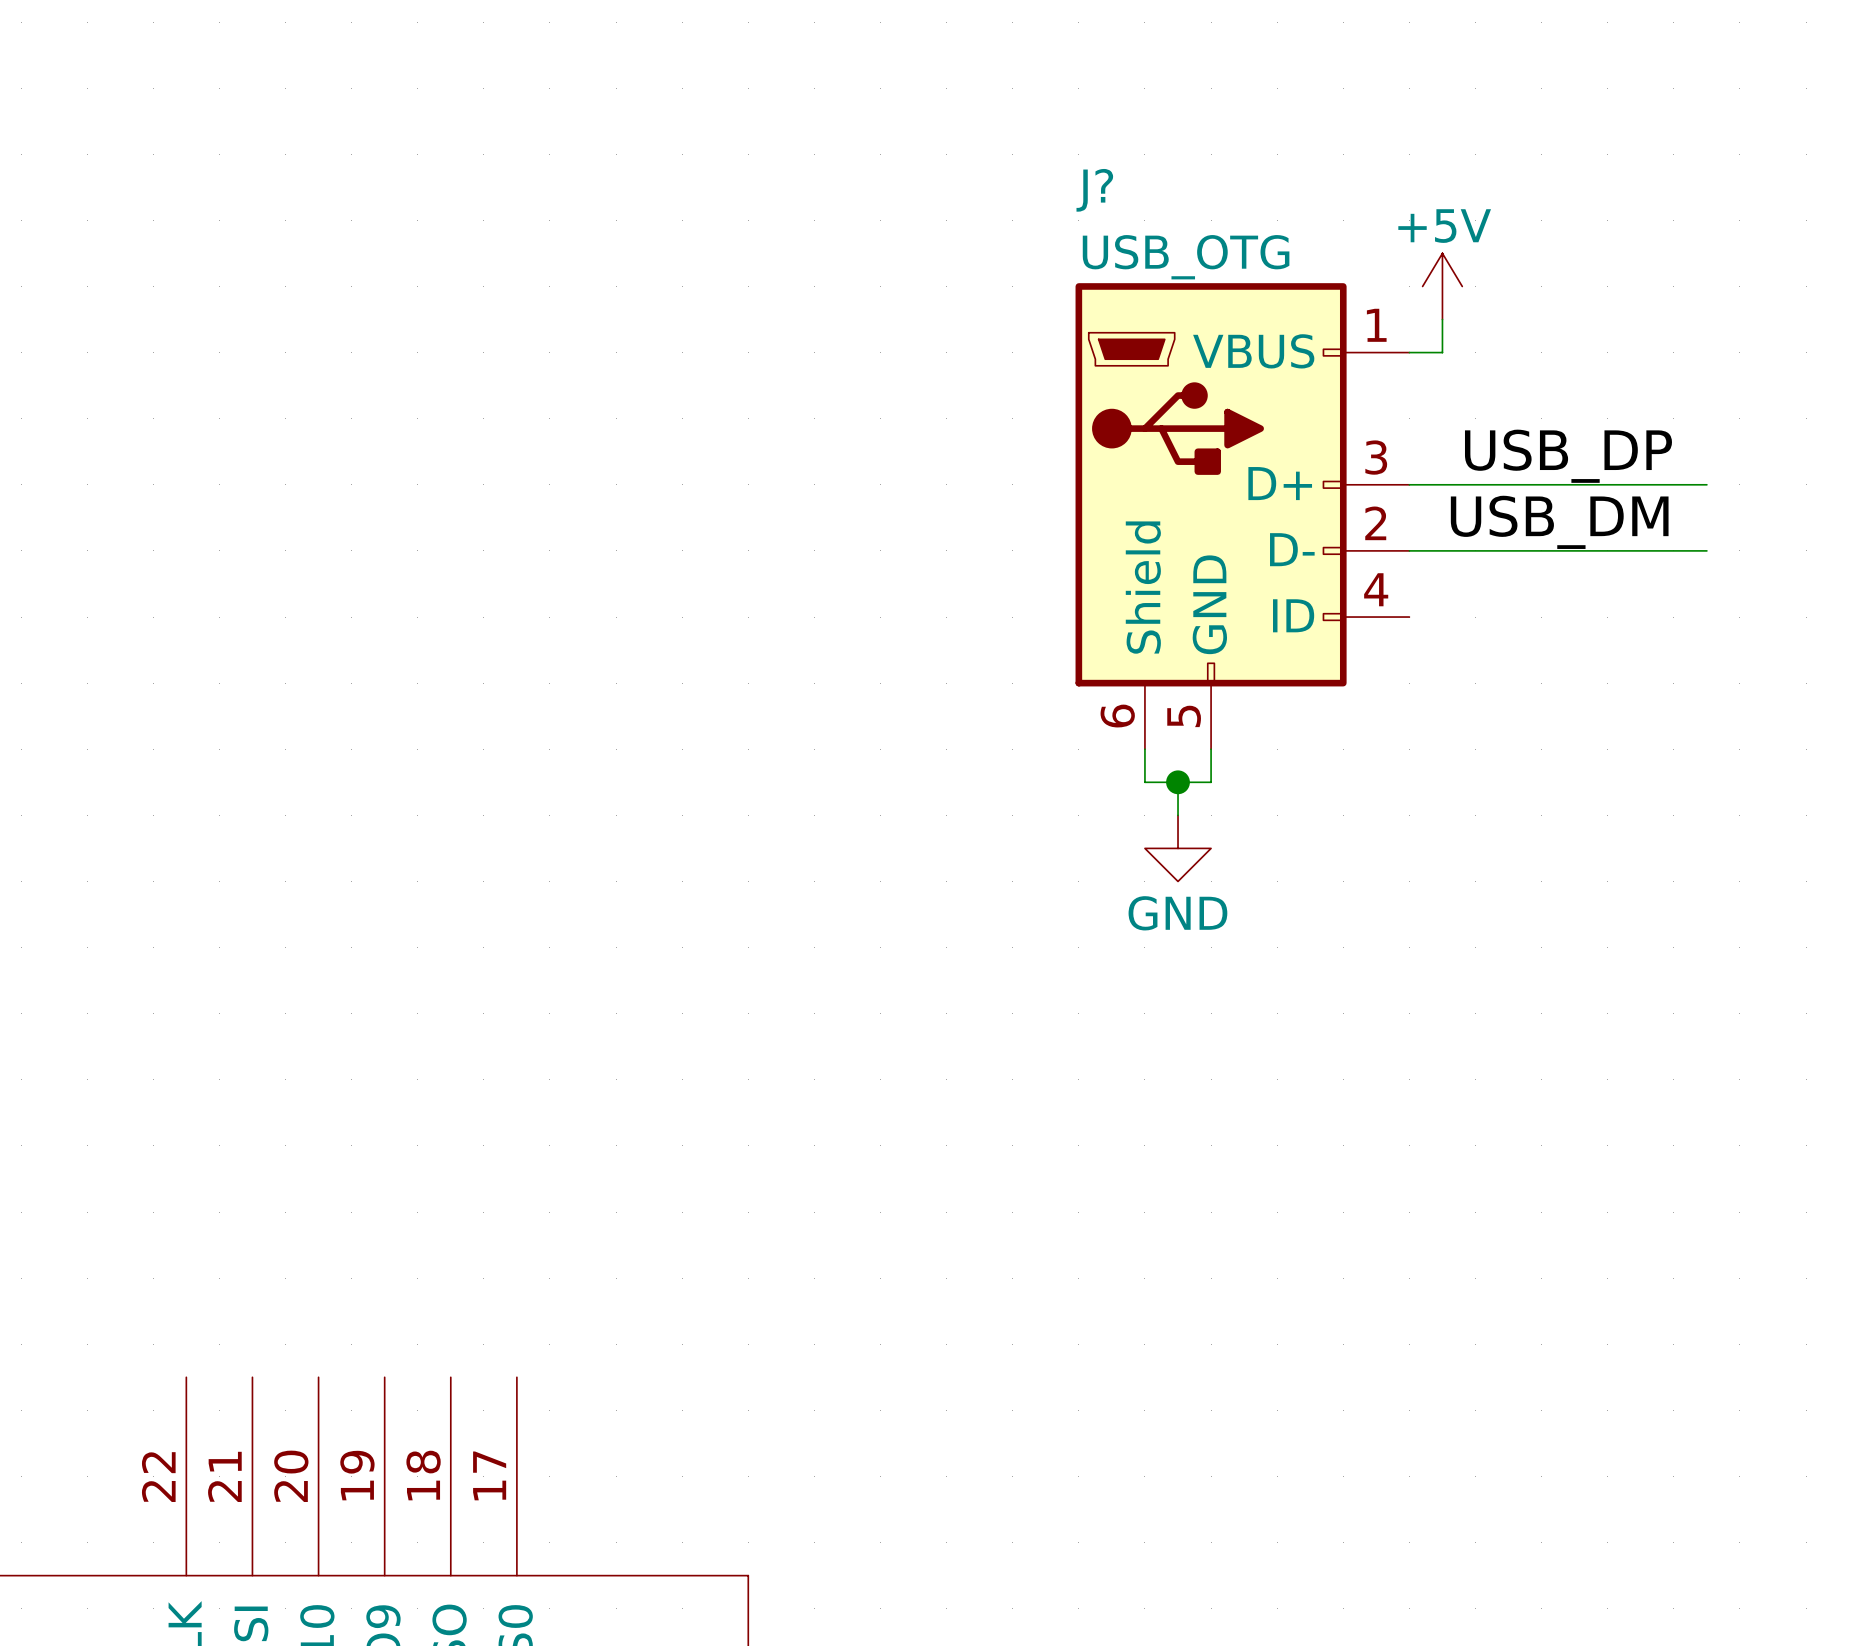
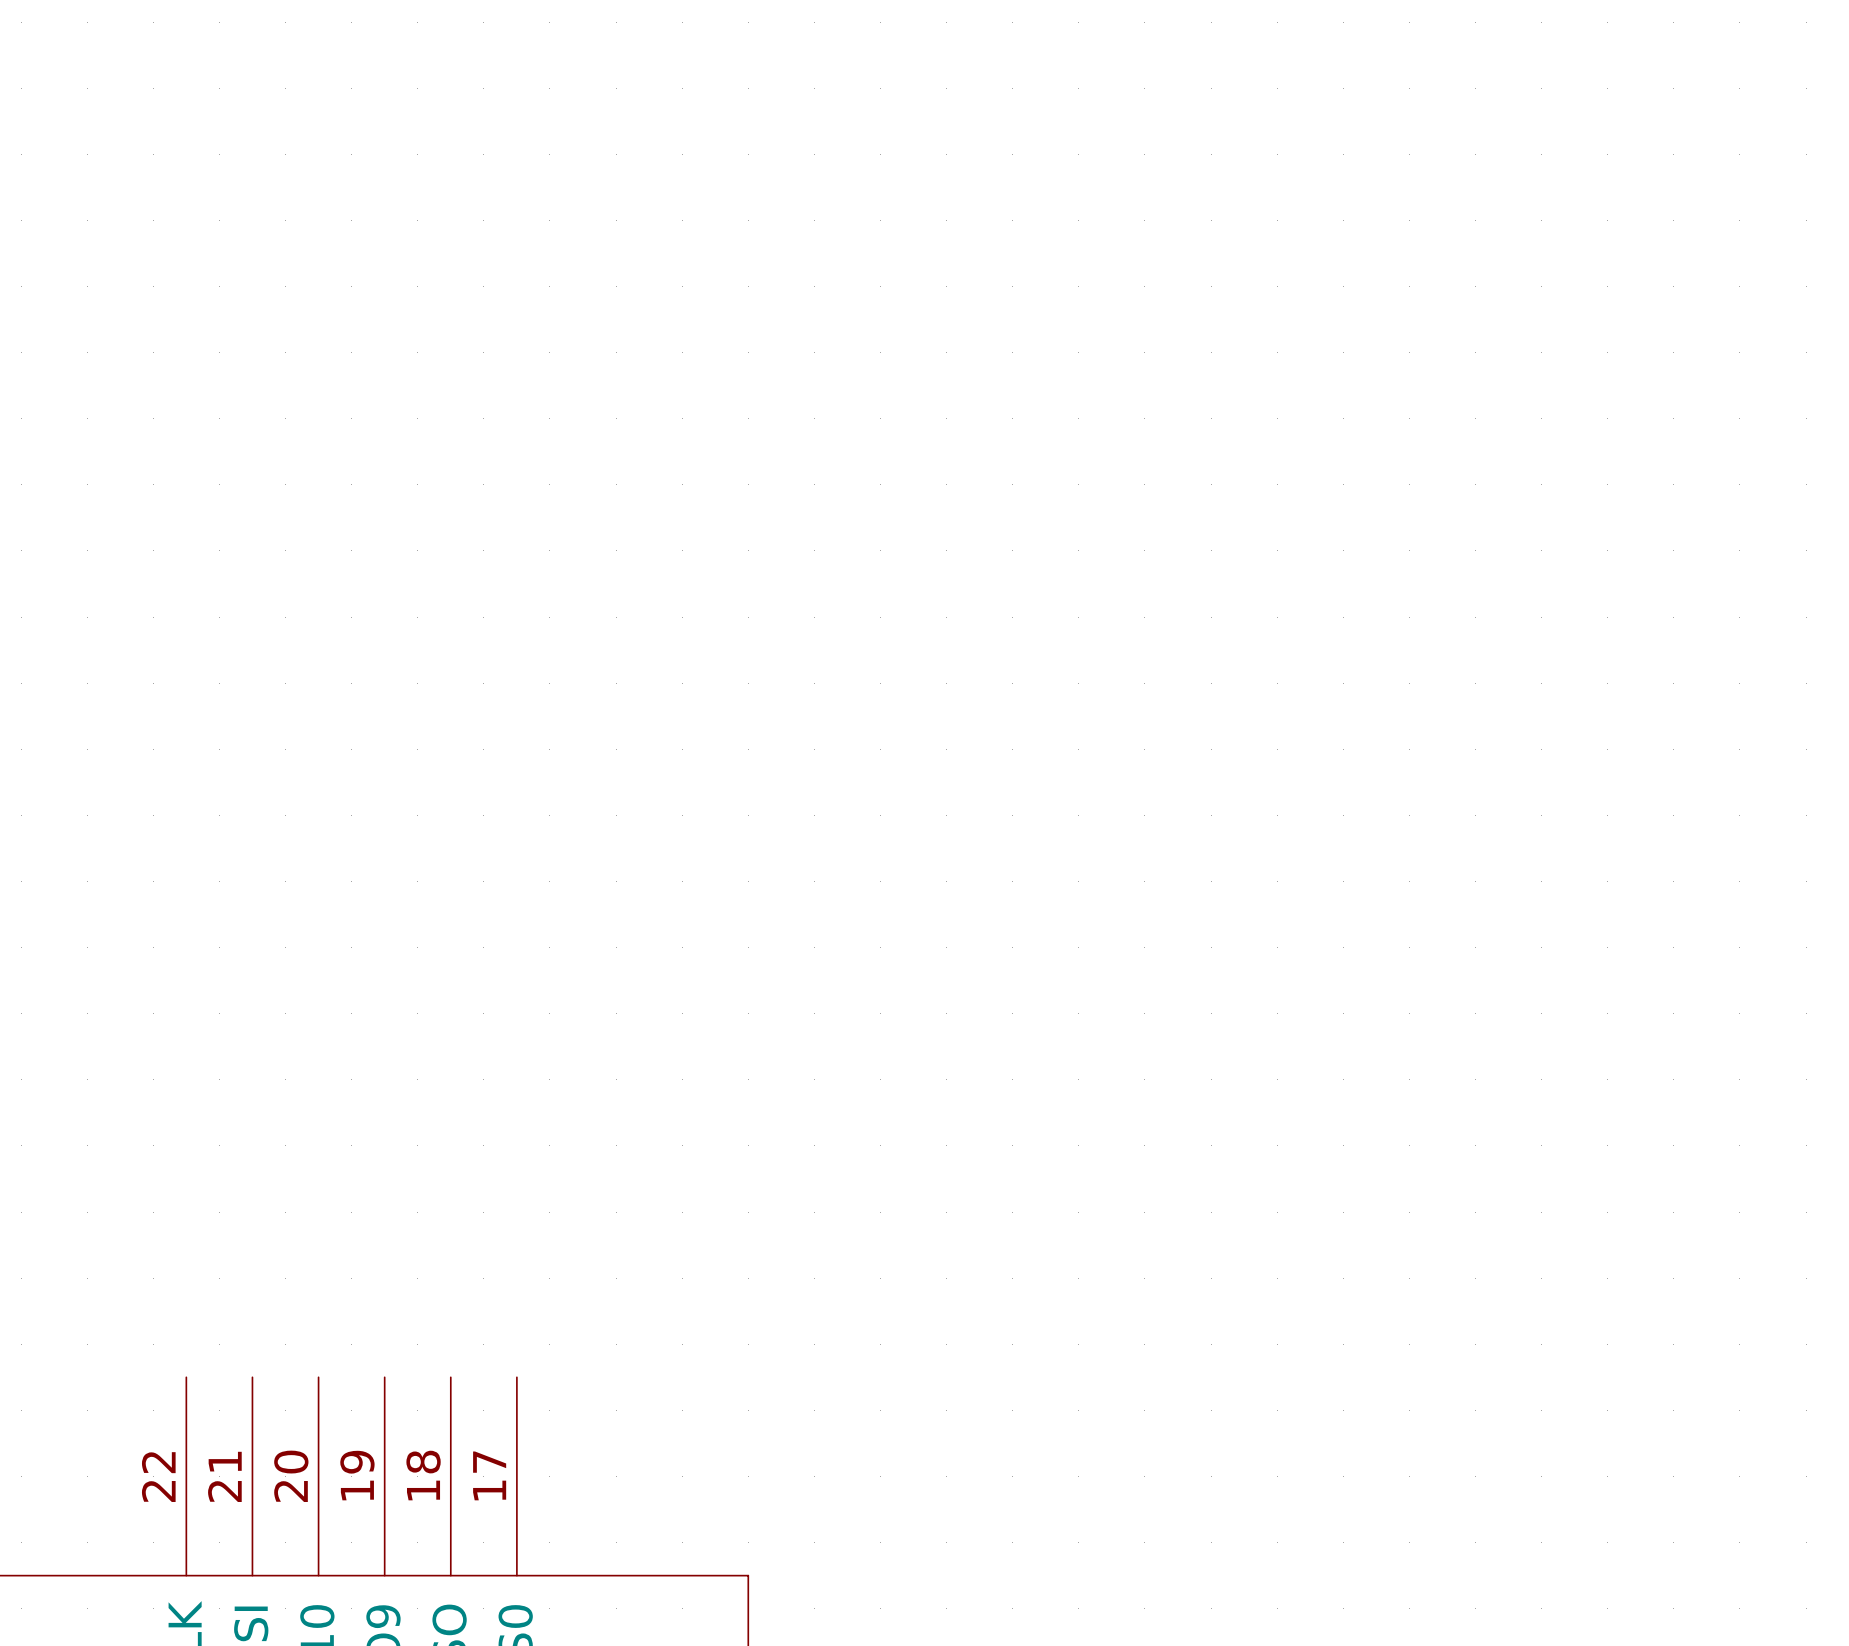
power symbol: +5V (1442, 286) -> none
wire: (1442, 319) (1442, 352) (1409, 352) -> none
label: USB_DP (1568, 456) -> none
wire: (1409, 484) (1706, 484) -> none
J?: USB_OTG (1242, 516) -> none
label: USB_DM (1559, 522) -> none
wire: (1409, 550) (1706, 550) -> none
wire: (1144, 749) (1144, 782) (1211, 782) (1211, 749) -> none
wire: (1178, 782) (1178, 815) -> none
junction: (1178, 782) -> none
power symbol: GND (1178, 848) -> none

